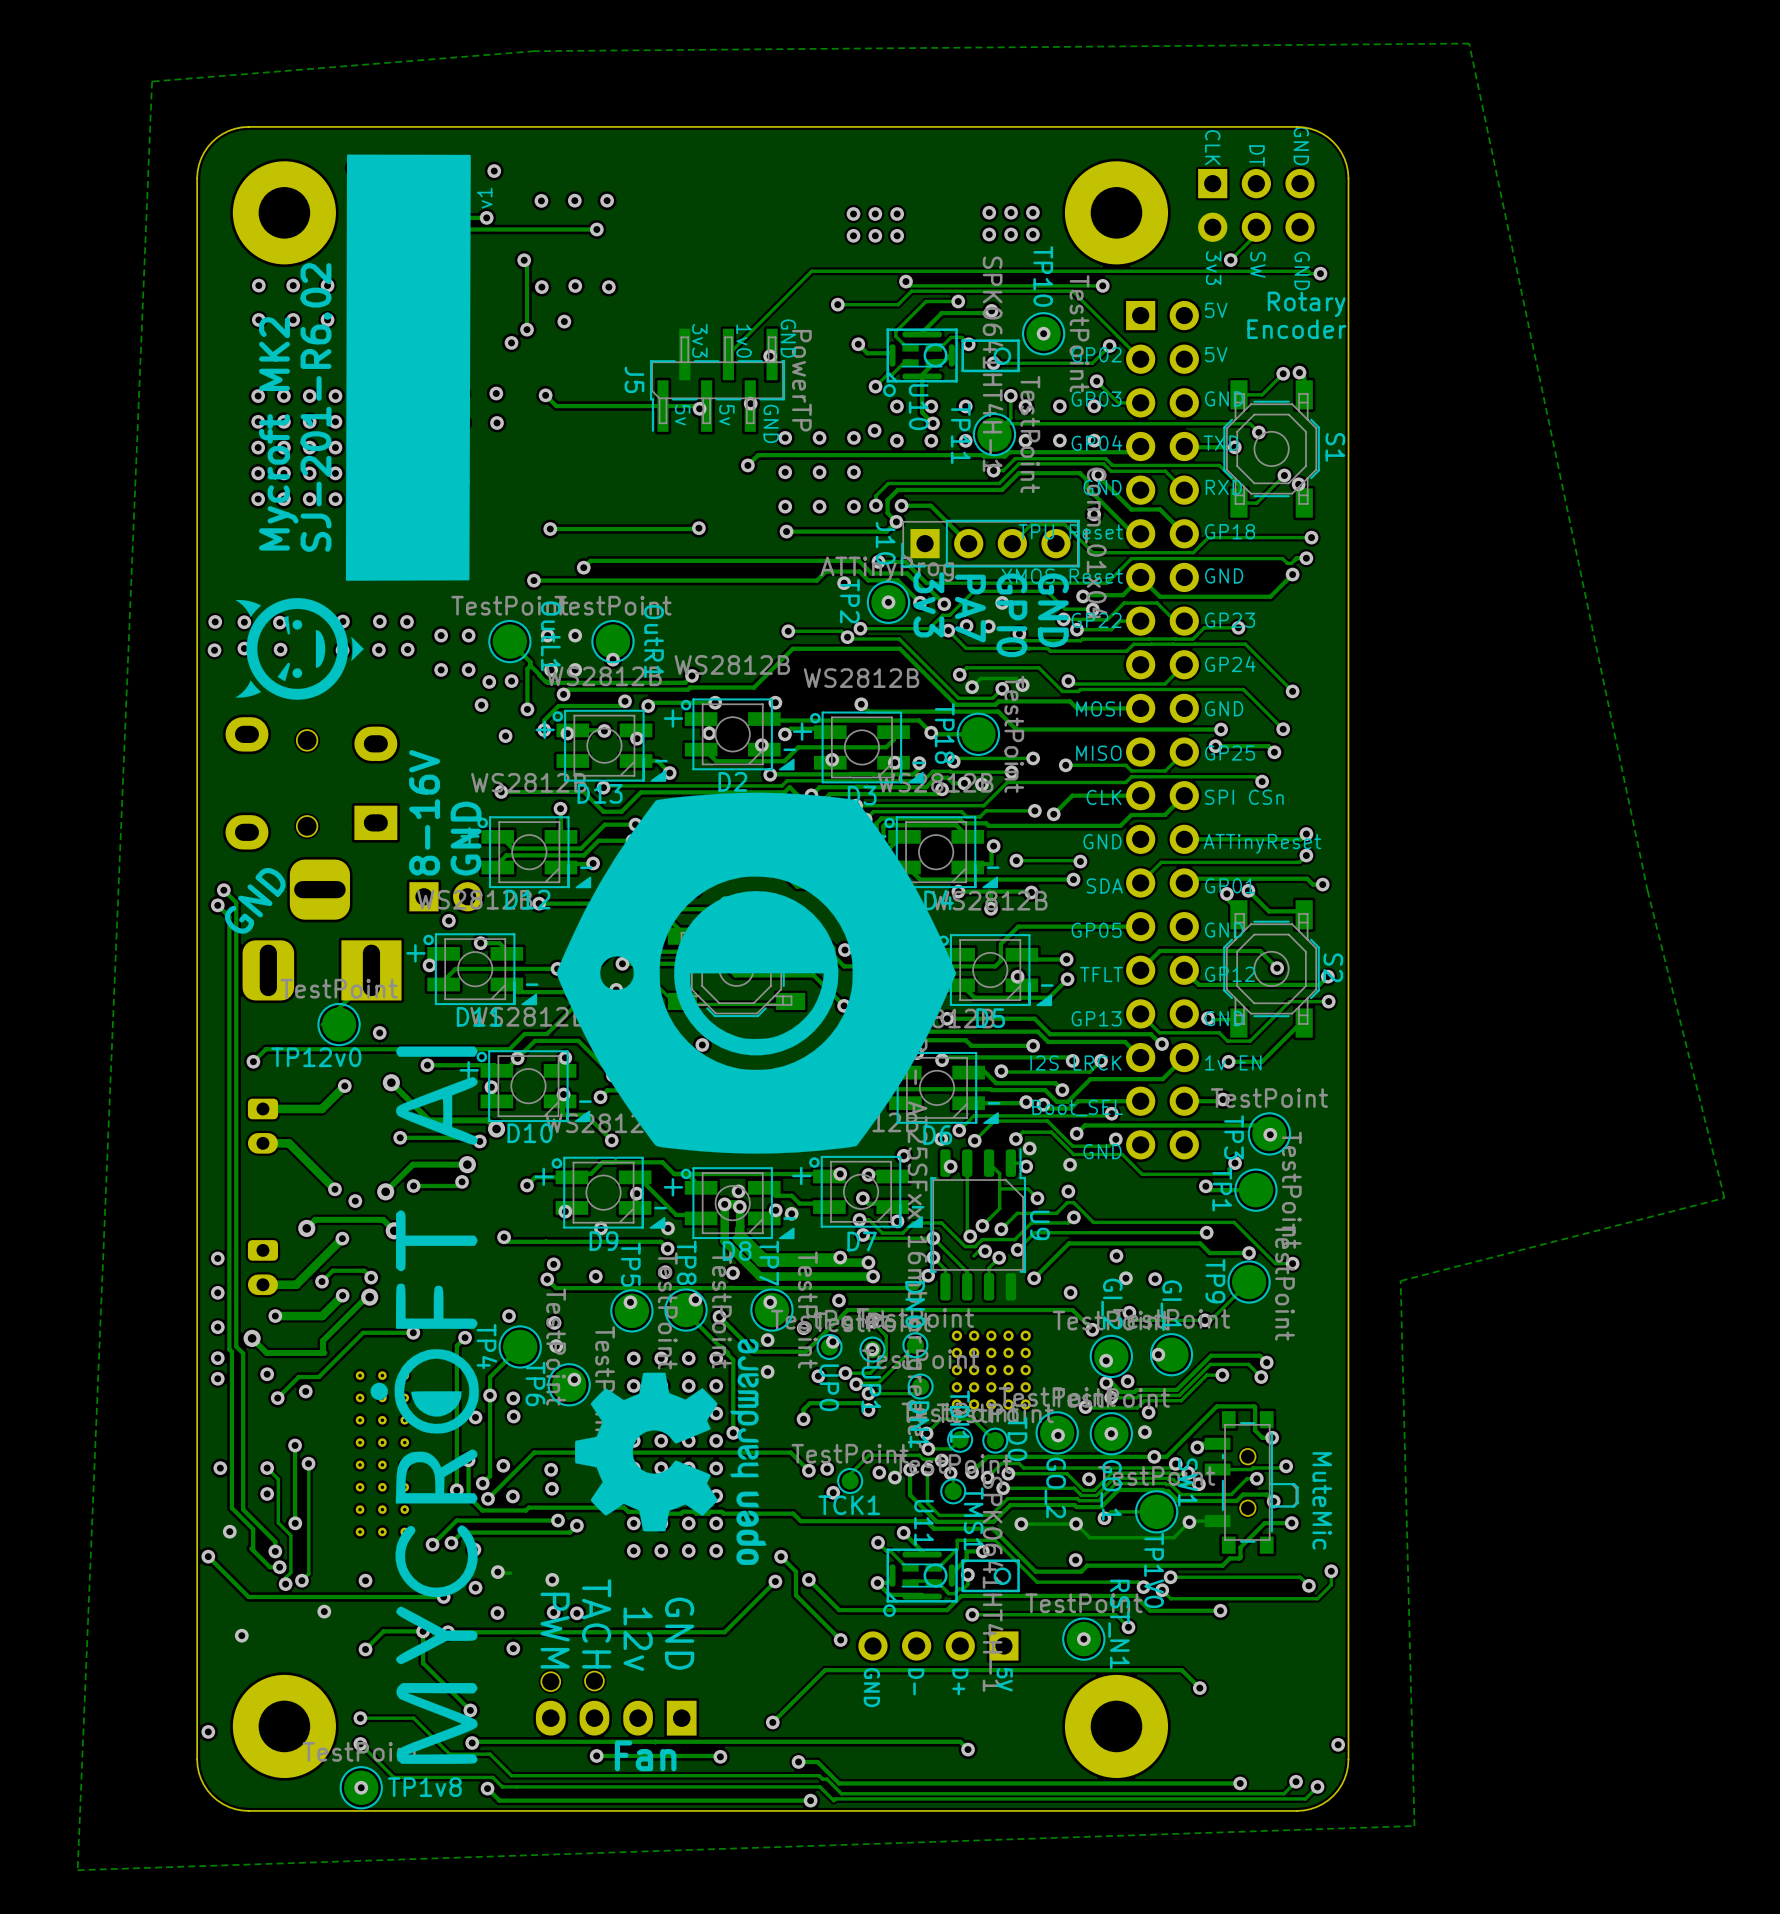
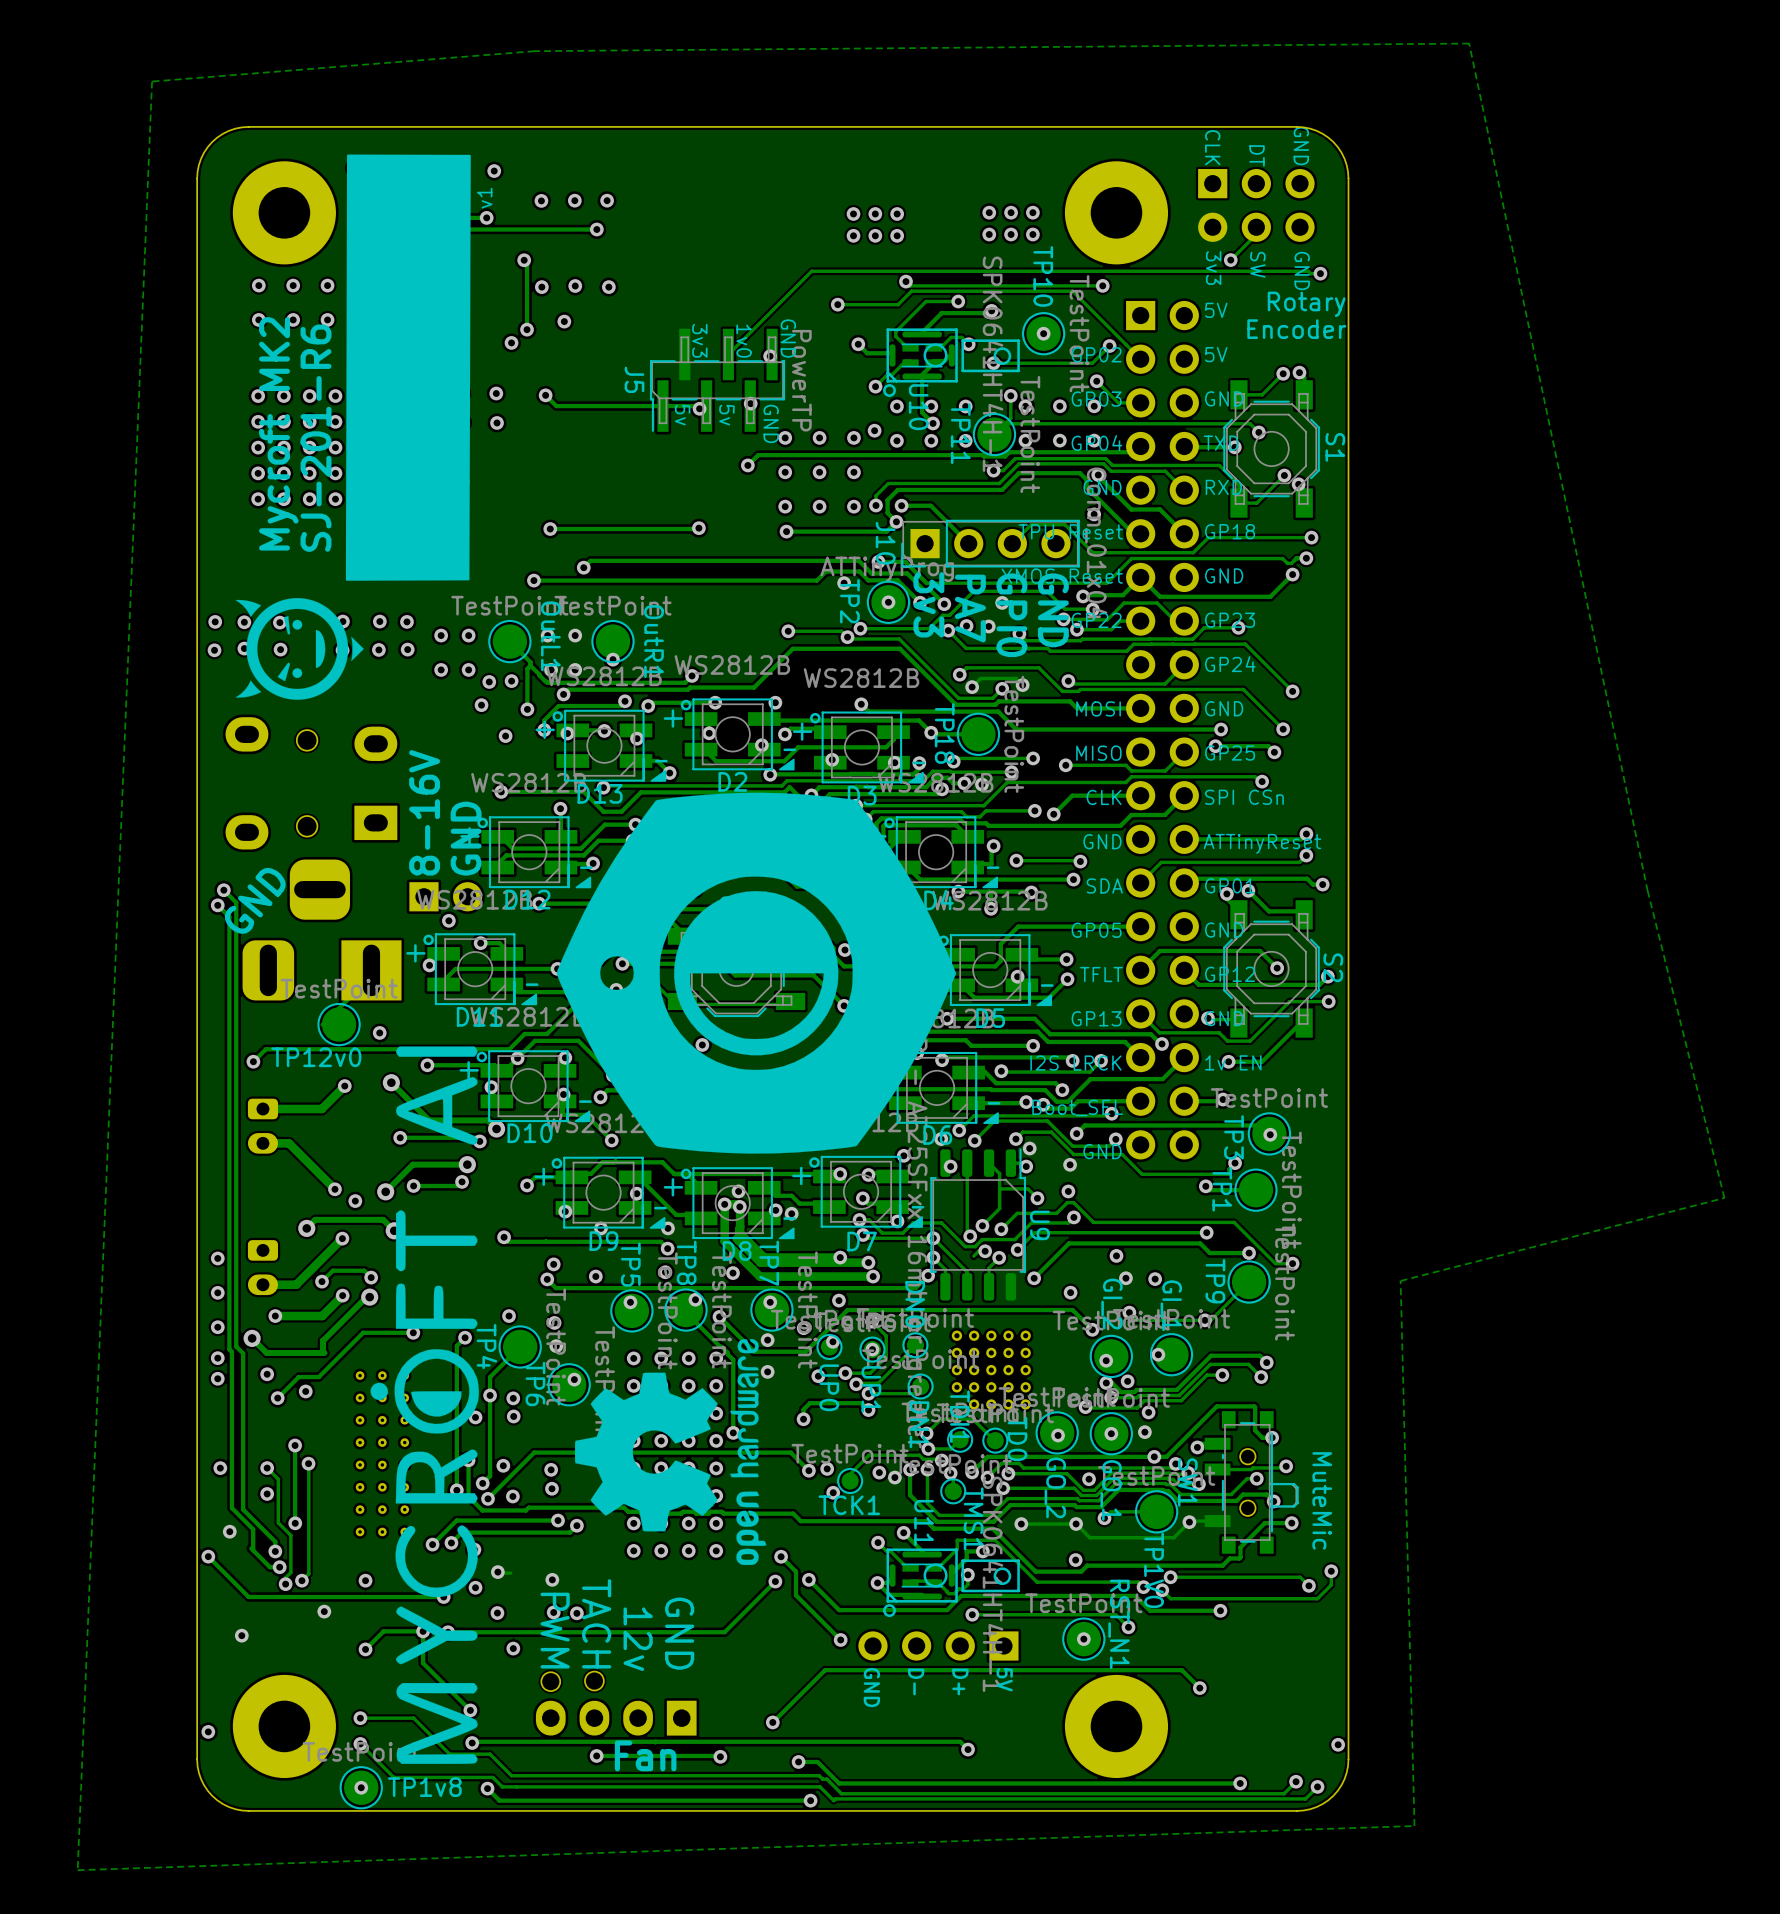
text: SJ-201-R6.02 (316, 407) -> SJ-201-R6 (316, 438)
part footprint: [951, 1330, 1031, 1410] -> [951, 1330, 1031, 1410]

